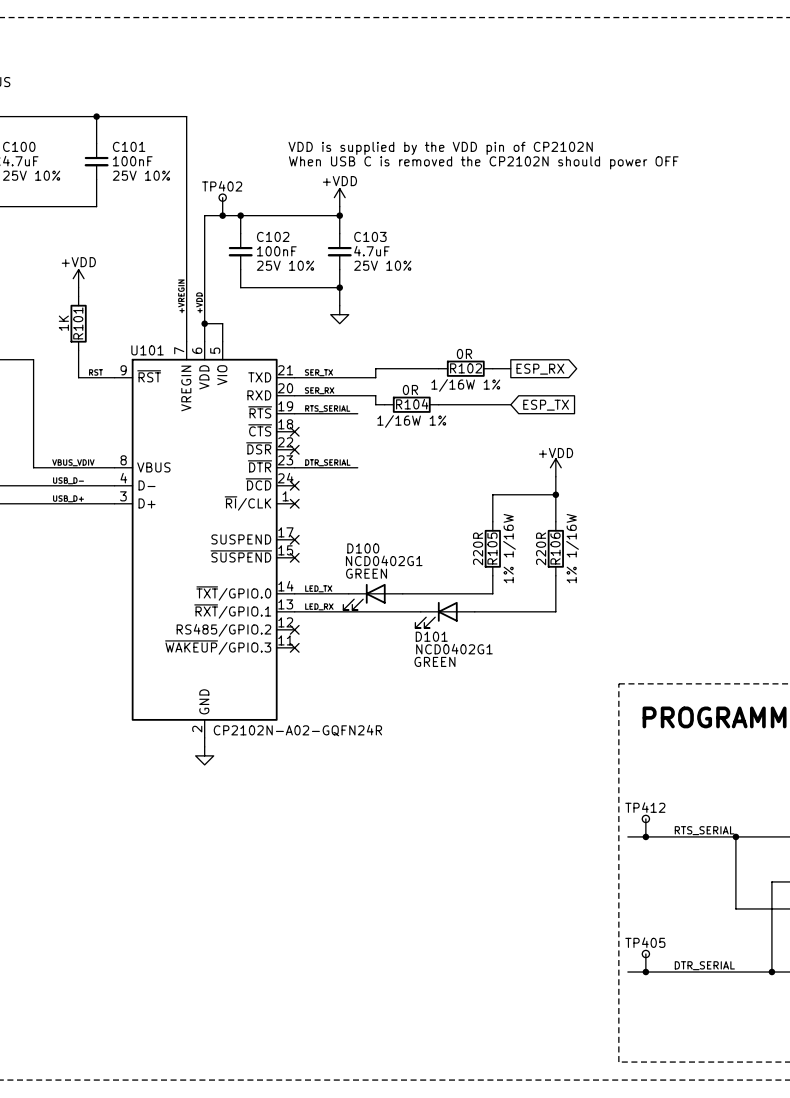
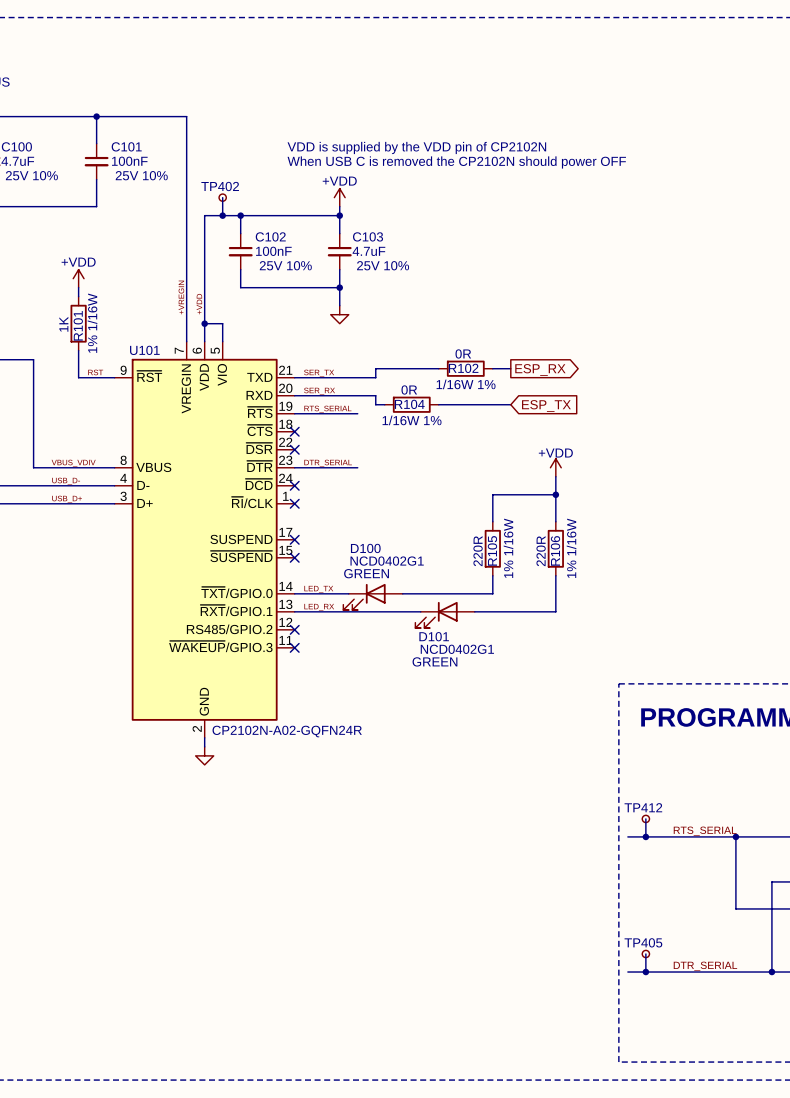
R101 text: none -> 1% 1/16W (92, 323)

